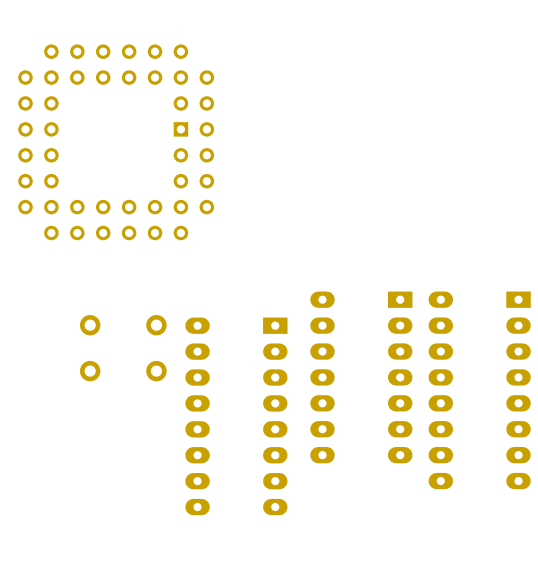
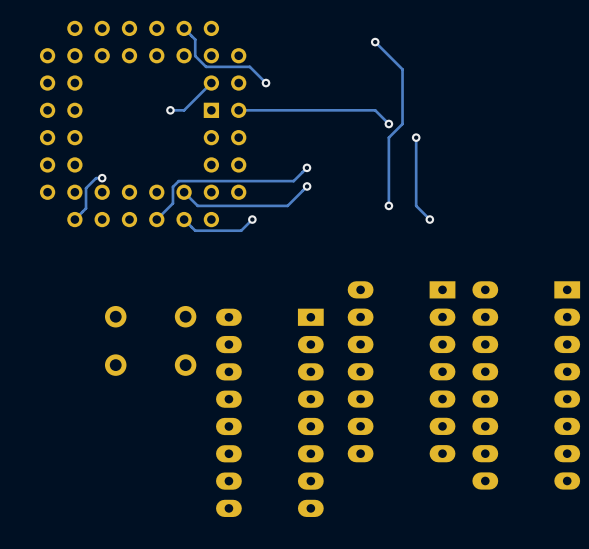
track: none -> (184, 28) (195, 39) (195, 56) (206, 66) (249, 66) (266, 83)
track: none -> (375, 42) (402, 69) (402, 123) (388, 137) (388, 205)
via: none -> (375, 42)
track: none -> (211, 83) (184, 110) (170, 110)
via: none -> (266, 83)
via: none -> (170, 110)
track: none -> (238, 110) (375, 110) (388, 123)
via: none -> (388, 123)
track: none -> (416, 137) (416, 205) (429, 219)
via: none -> (416, 137)
track: none -> (306, 167) (293, 181) (178, 181) (172, 186) (172, 203) (156, 219)
via: none -> (306, 167)
track: none -> (102, 178) (96, 178) (86, 188) (86, 208) (74, 219)
via: none -> (102, 178)
track: none -> (307, 186) (287, 205) (197, 205) (184, 192)
via: none -> (307, 186)
via: none -> (388, 205)
track: none -> (252, 219) (241, 230) (195, 230) (184, 219)
via: none -> (252, 219)
via: none -> (429, 219)

